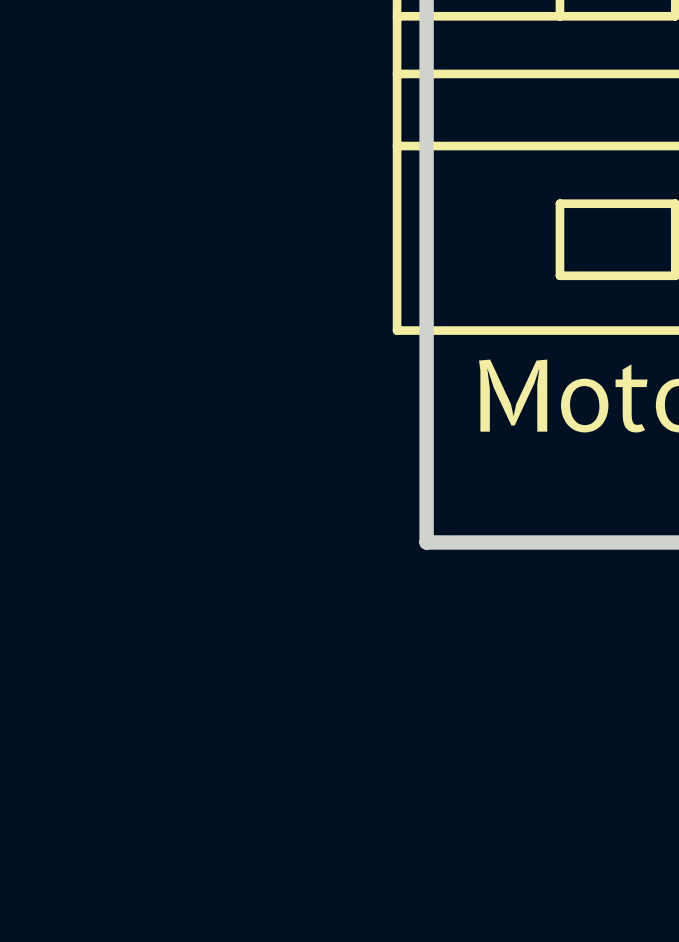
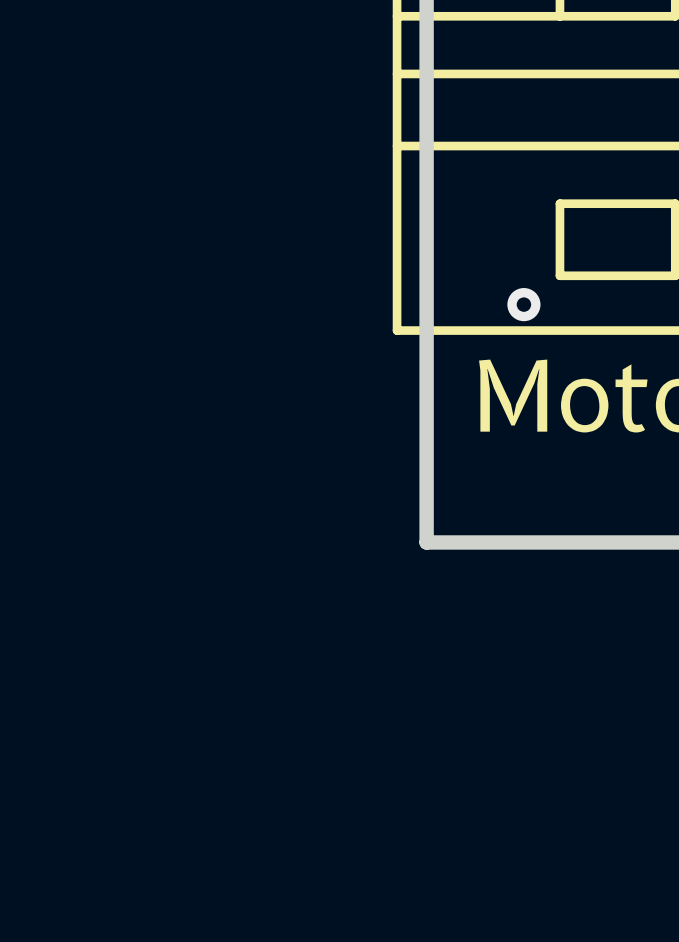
via: none -> (523, 304)

